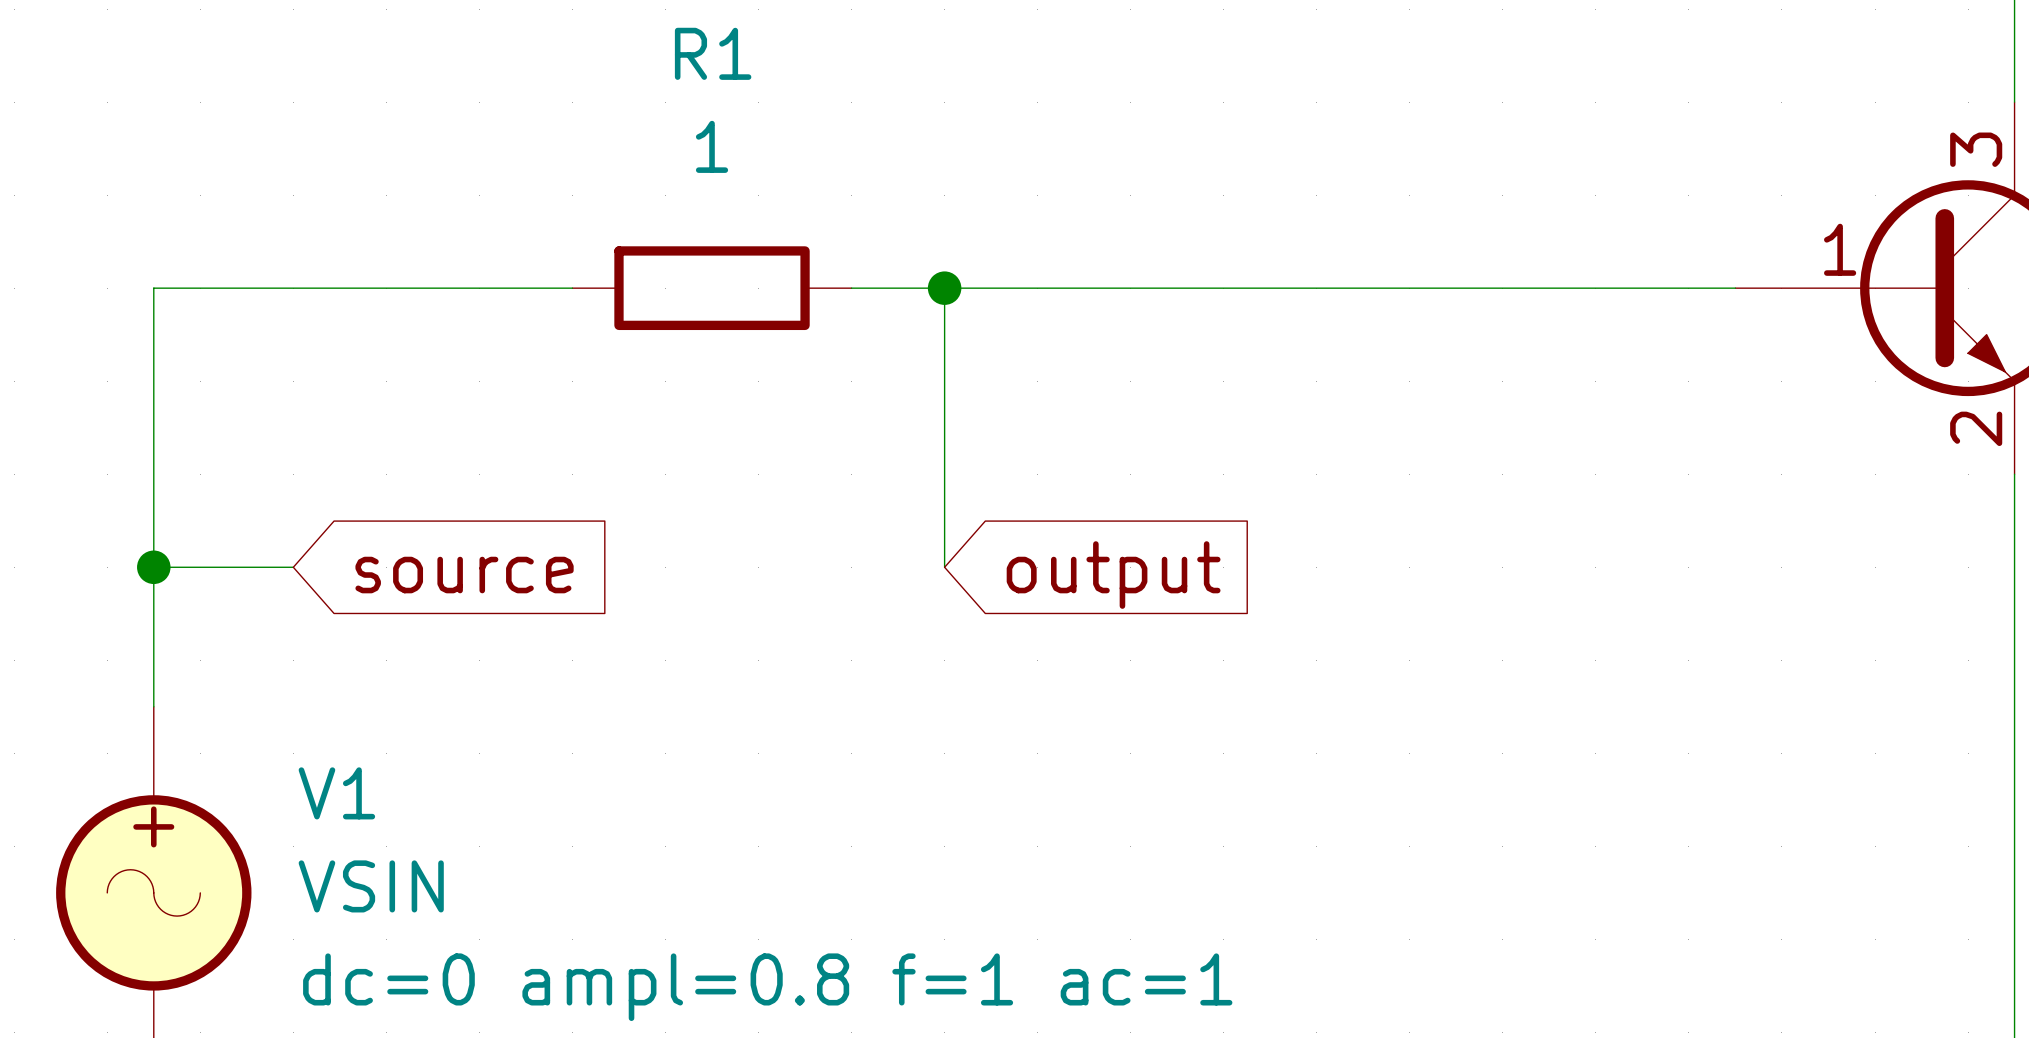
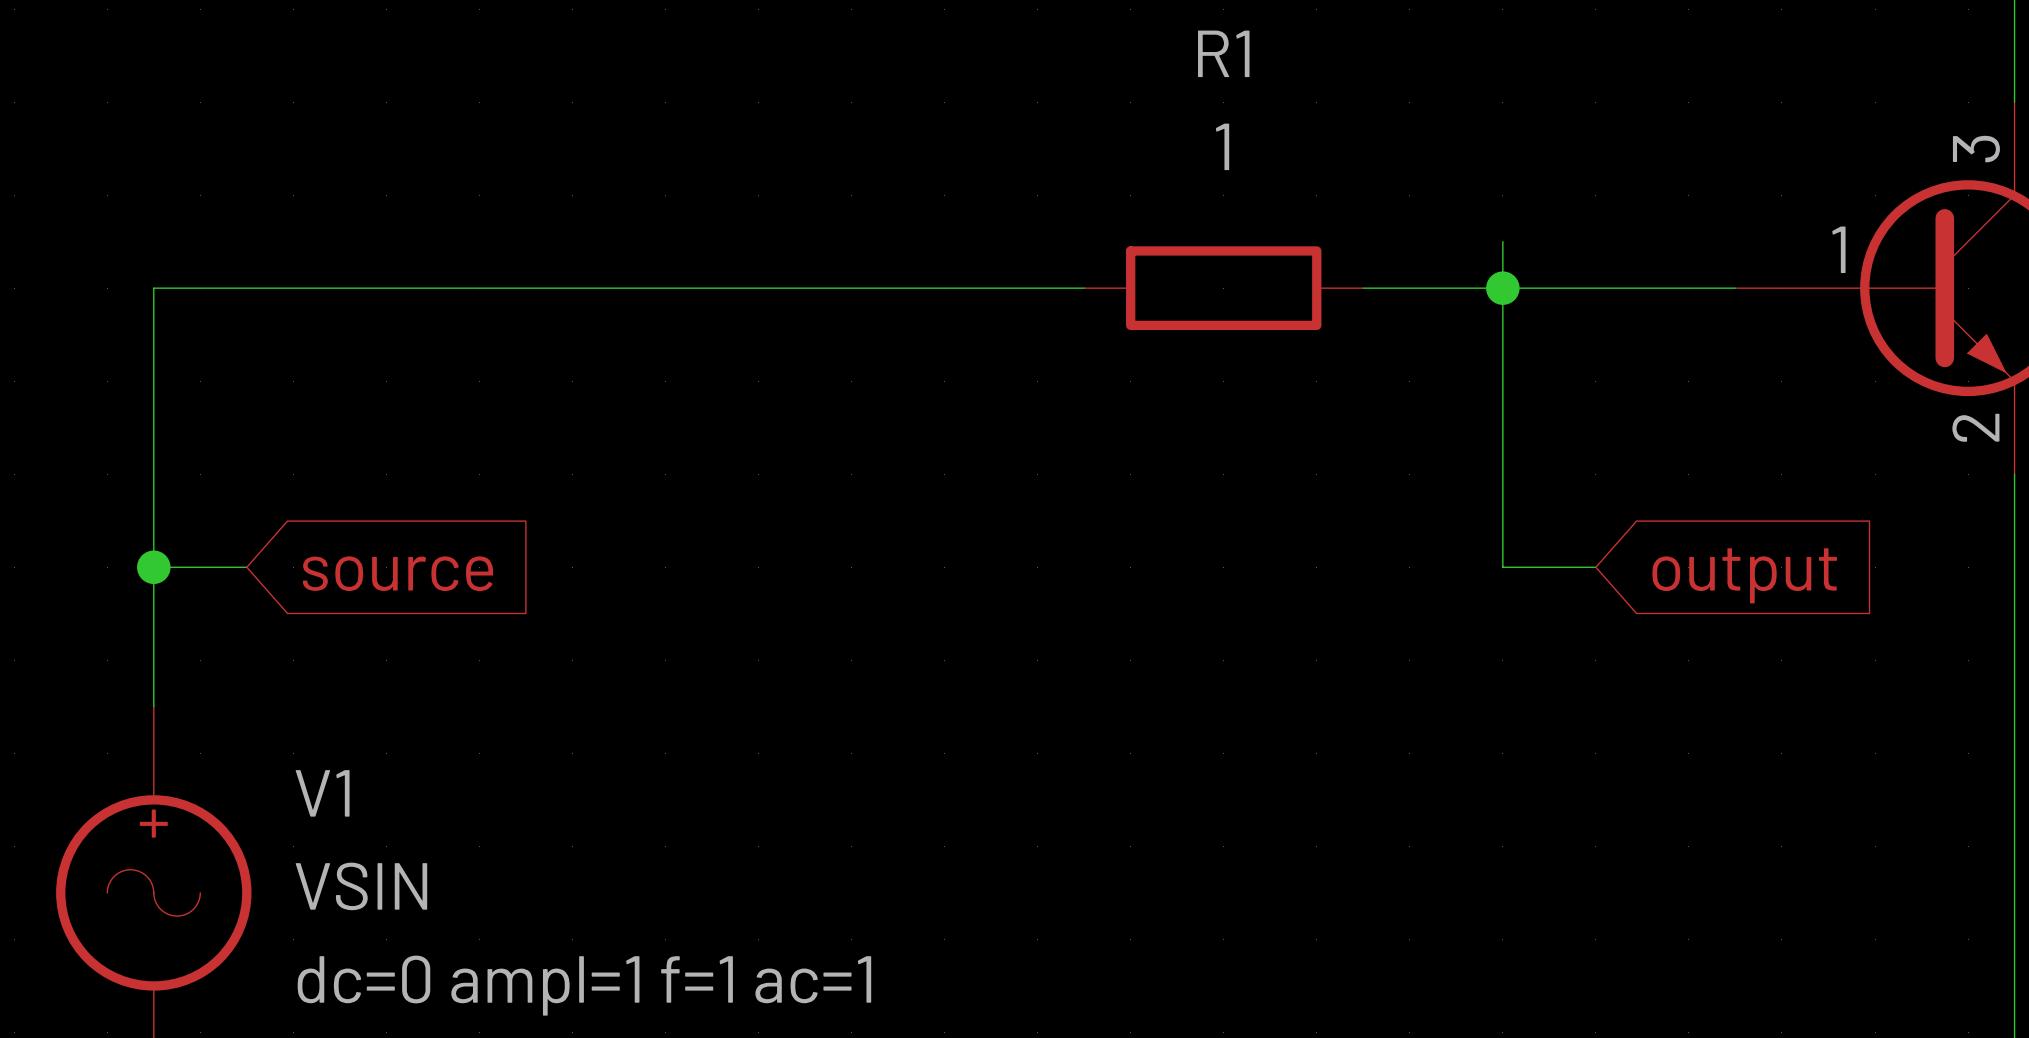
wire: none -> (1502, 241) (1502, 567) (1595, 567)
R1 position: (712, 288) -> (1223, 288)
wire: (944, 288) (944, 567) -> none
junction: (944, 288) -> none
wire: (1084, 288) (1363, 288) -> (572, 288) (851, 288)
junction: none -> (1502, 288)
wire: (246, 567) (293, 567) -> none
global label position: source (464, 575) -> source (397, 573)
global label position: output (1113, 575) -> output (1744, 575)
V1 text: dc=0 ampl=0.8 f=1 ac=1 (767, 987) -> dc=0 ampl=1 f=1 ac=1 (584, 985)

